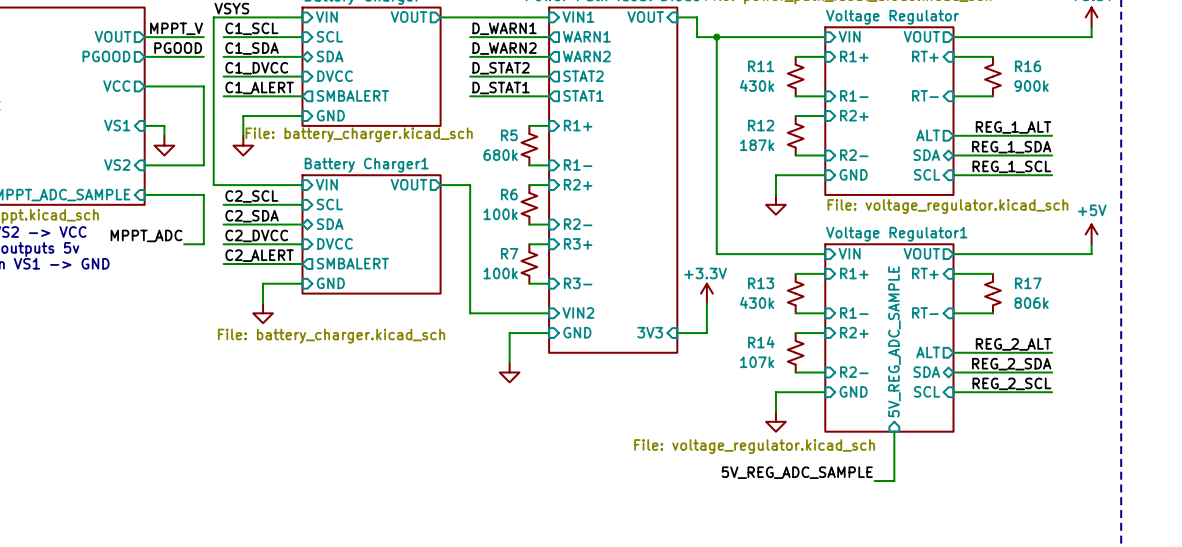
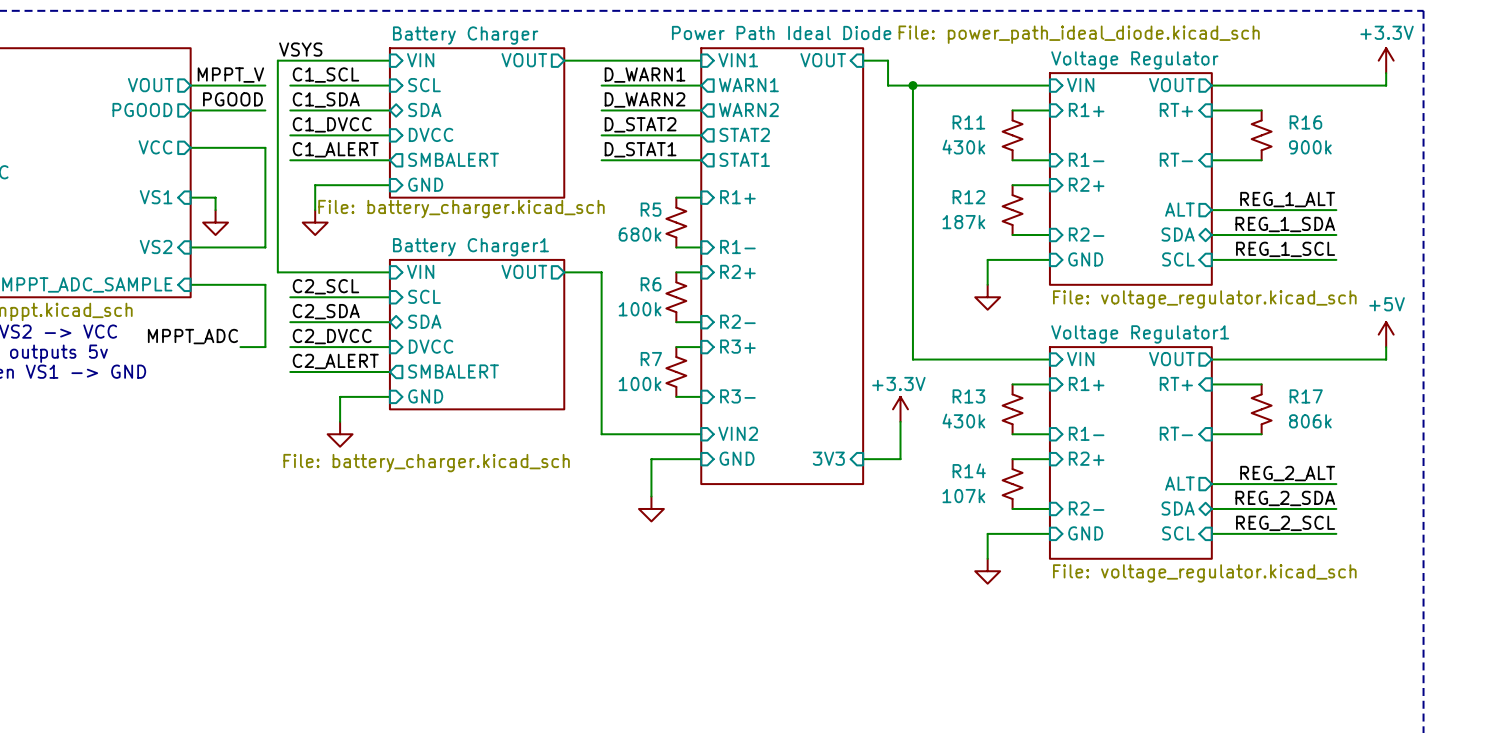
sheet Voltage Regulator1 shape: [824, 243, 955, 433] -> [1049, 346, 1213, 560]
sheet pin: 5V_REG_ADC_SAMPLE (894, 341) -> none
wire: (894, 431) (894, 481) (874, 481) -> none
sheet Voltage Regulator1 value position: File: voltage_regulator.kicad_sch (754, 446) -> File: voltage_regulator.kicad_sch (1204, 573)
label: 5V_REG_ADC_SAMPLE (797, 472) -> none

